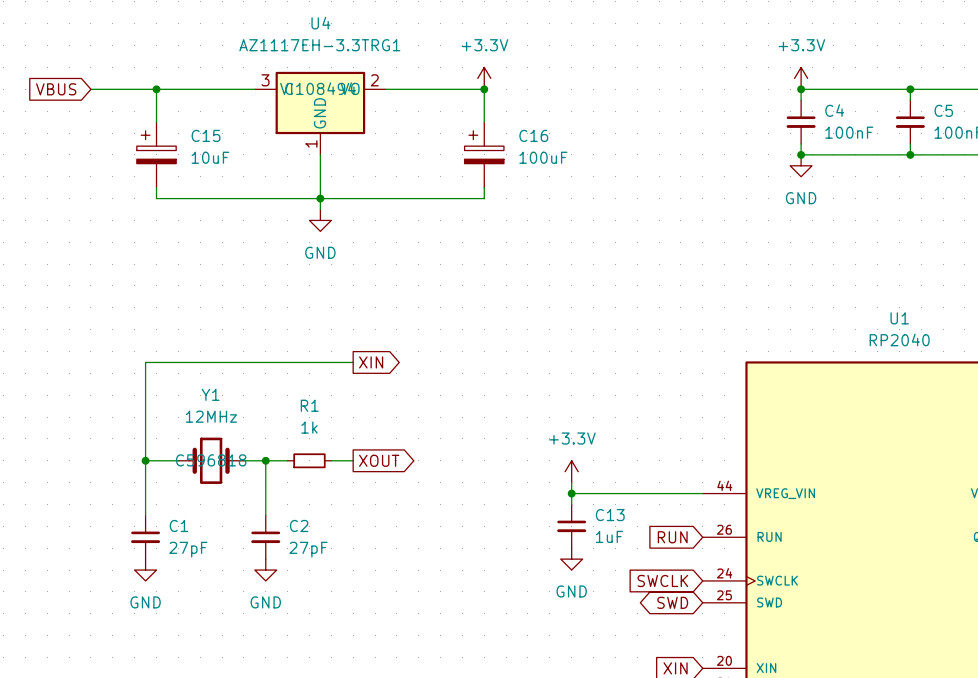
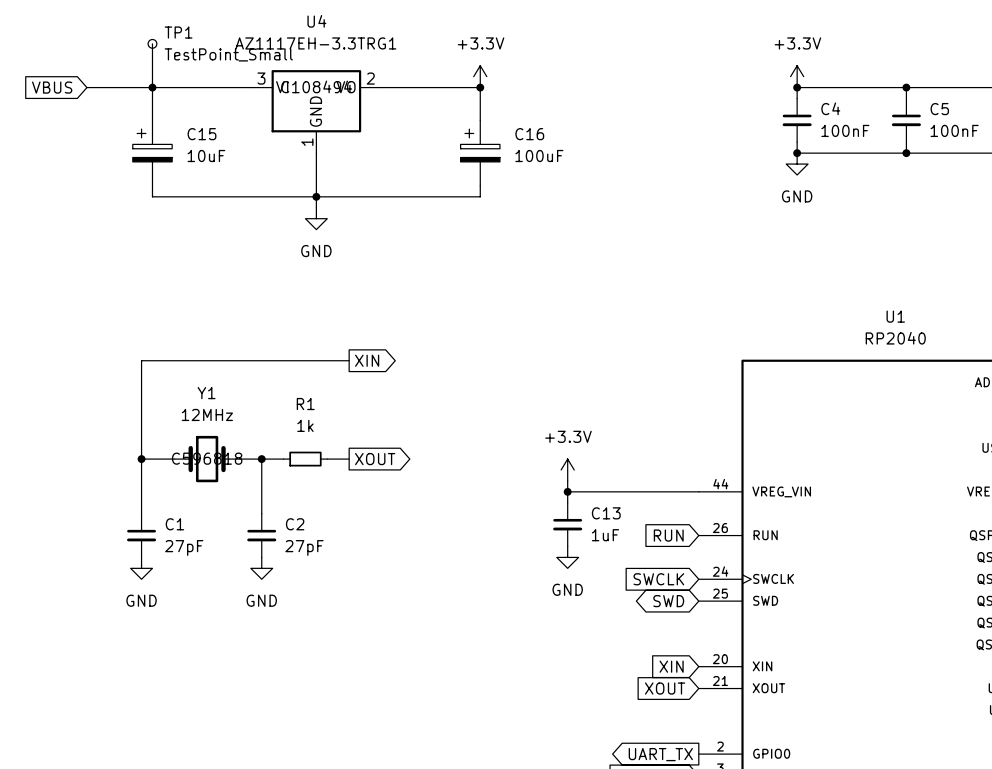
wire: none -> (152, 43) (152, 87)
TP1: none -> TestPoint_Small (152, 43)

